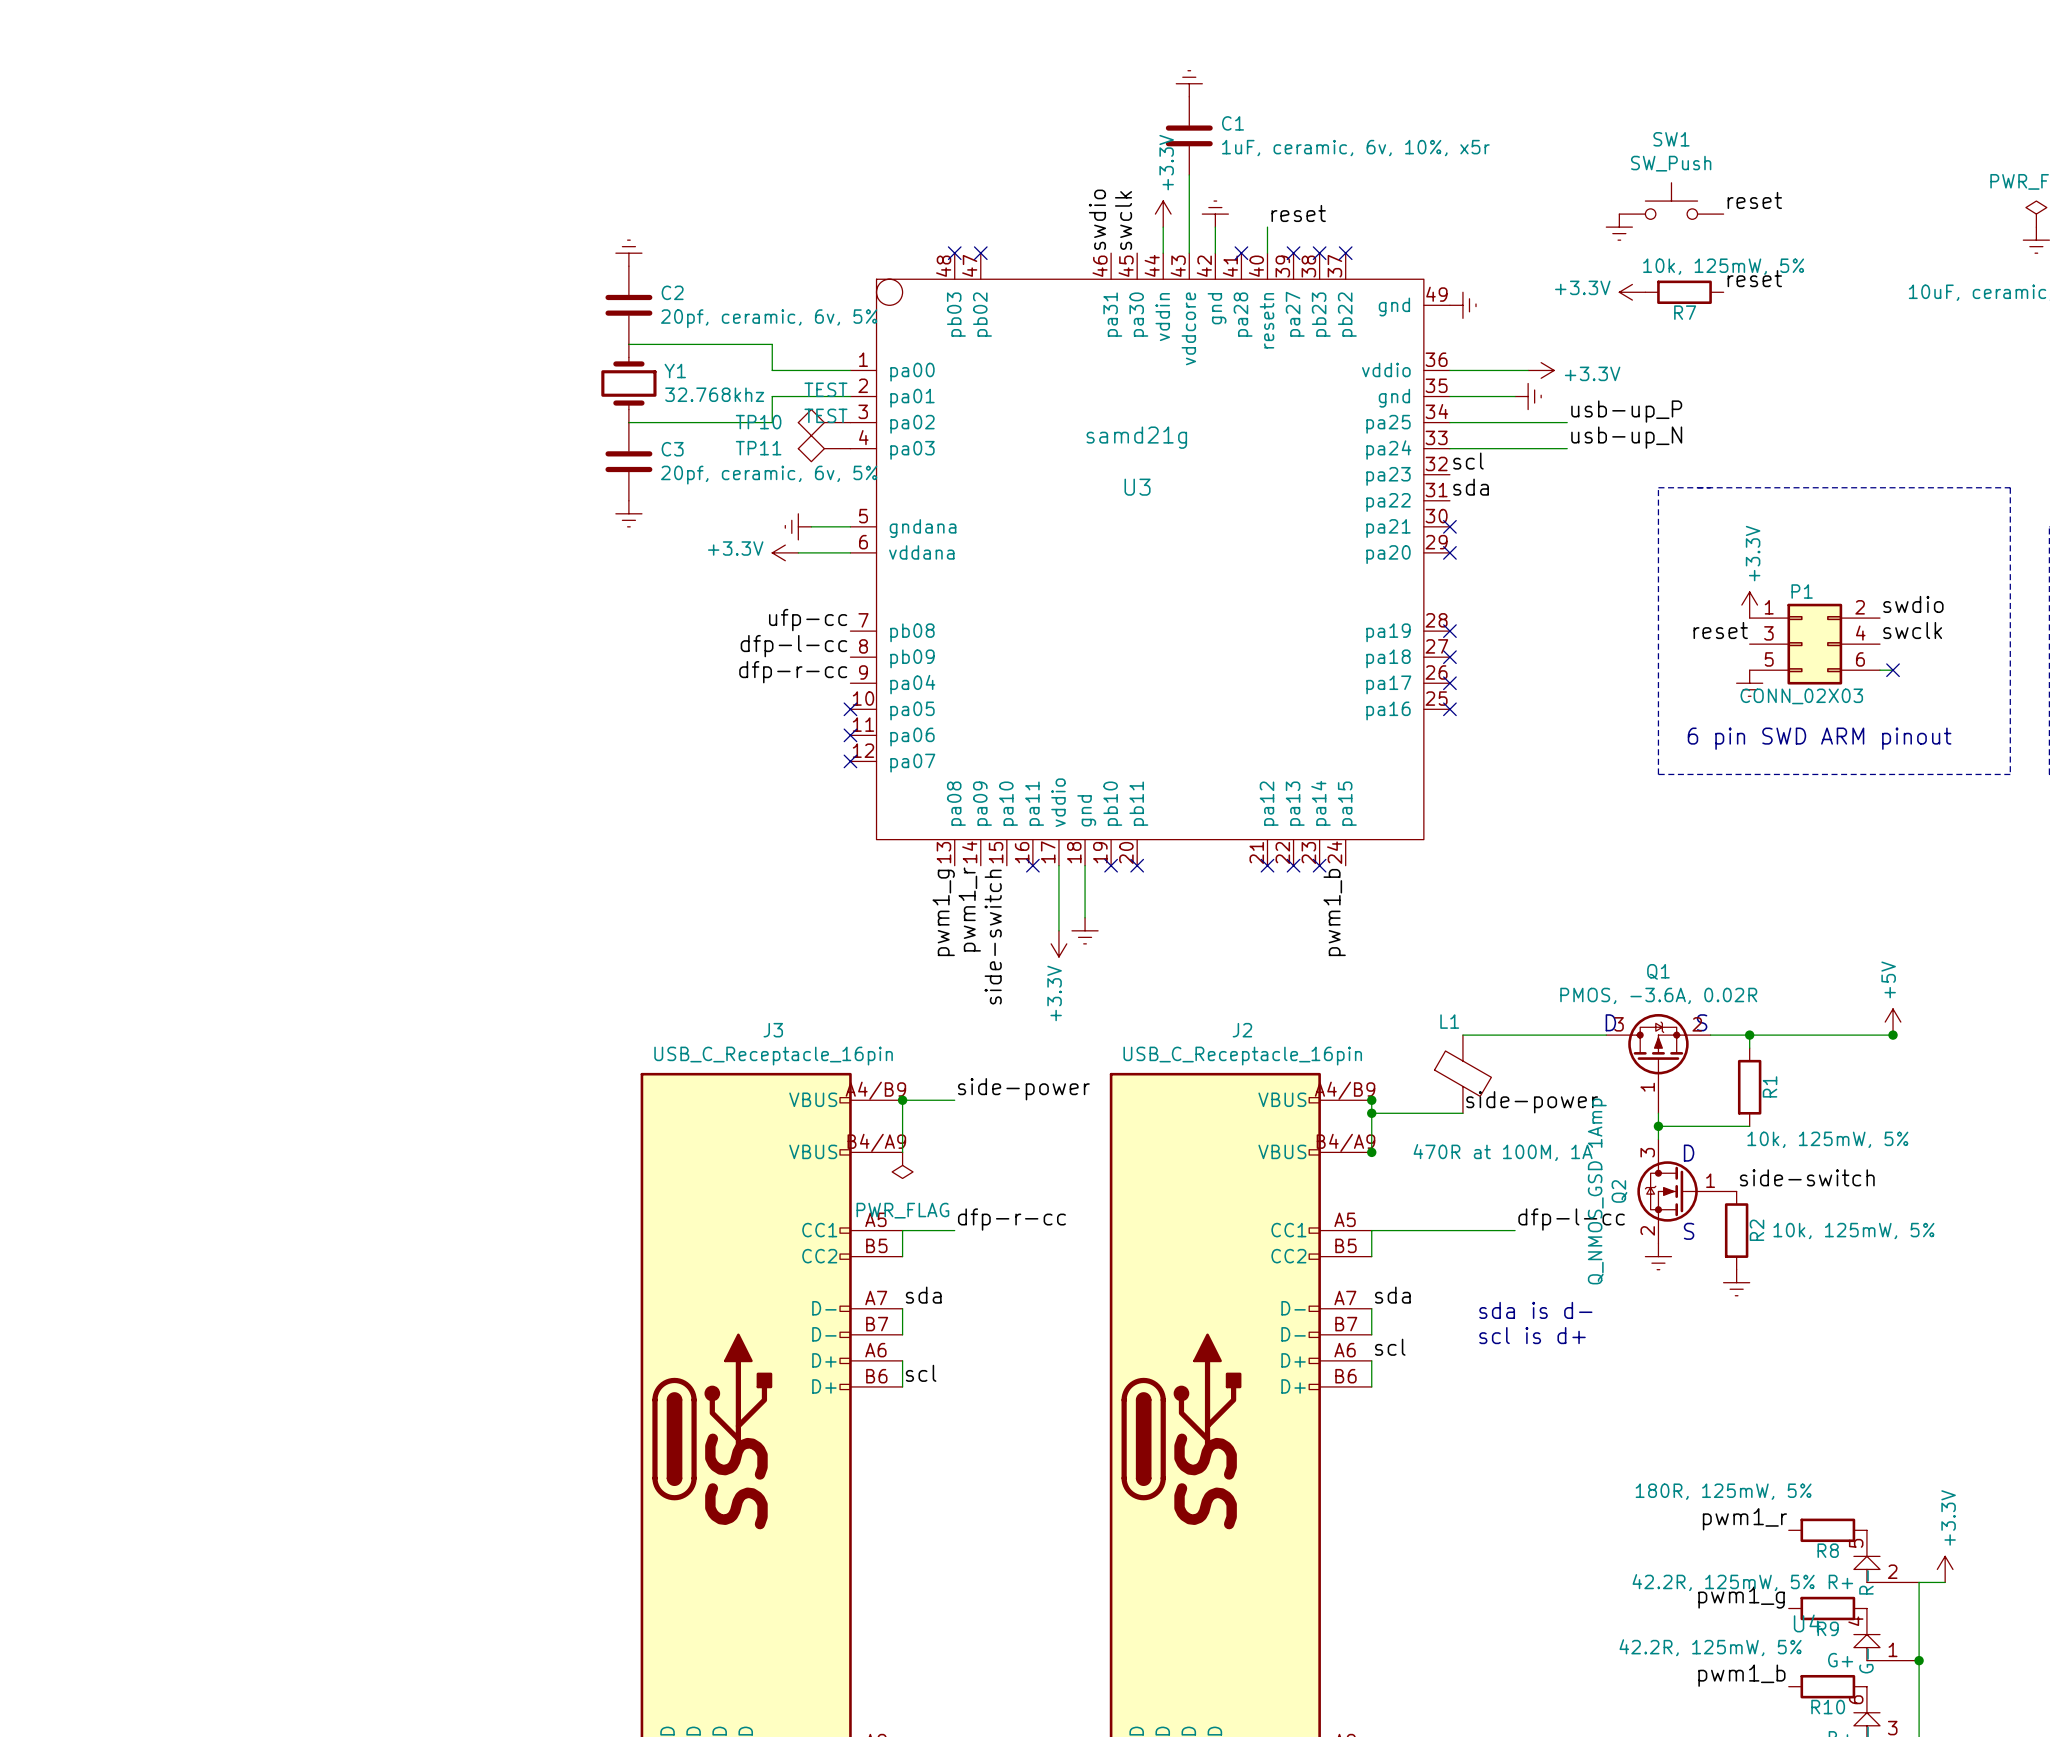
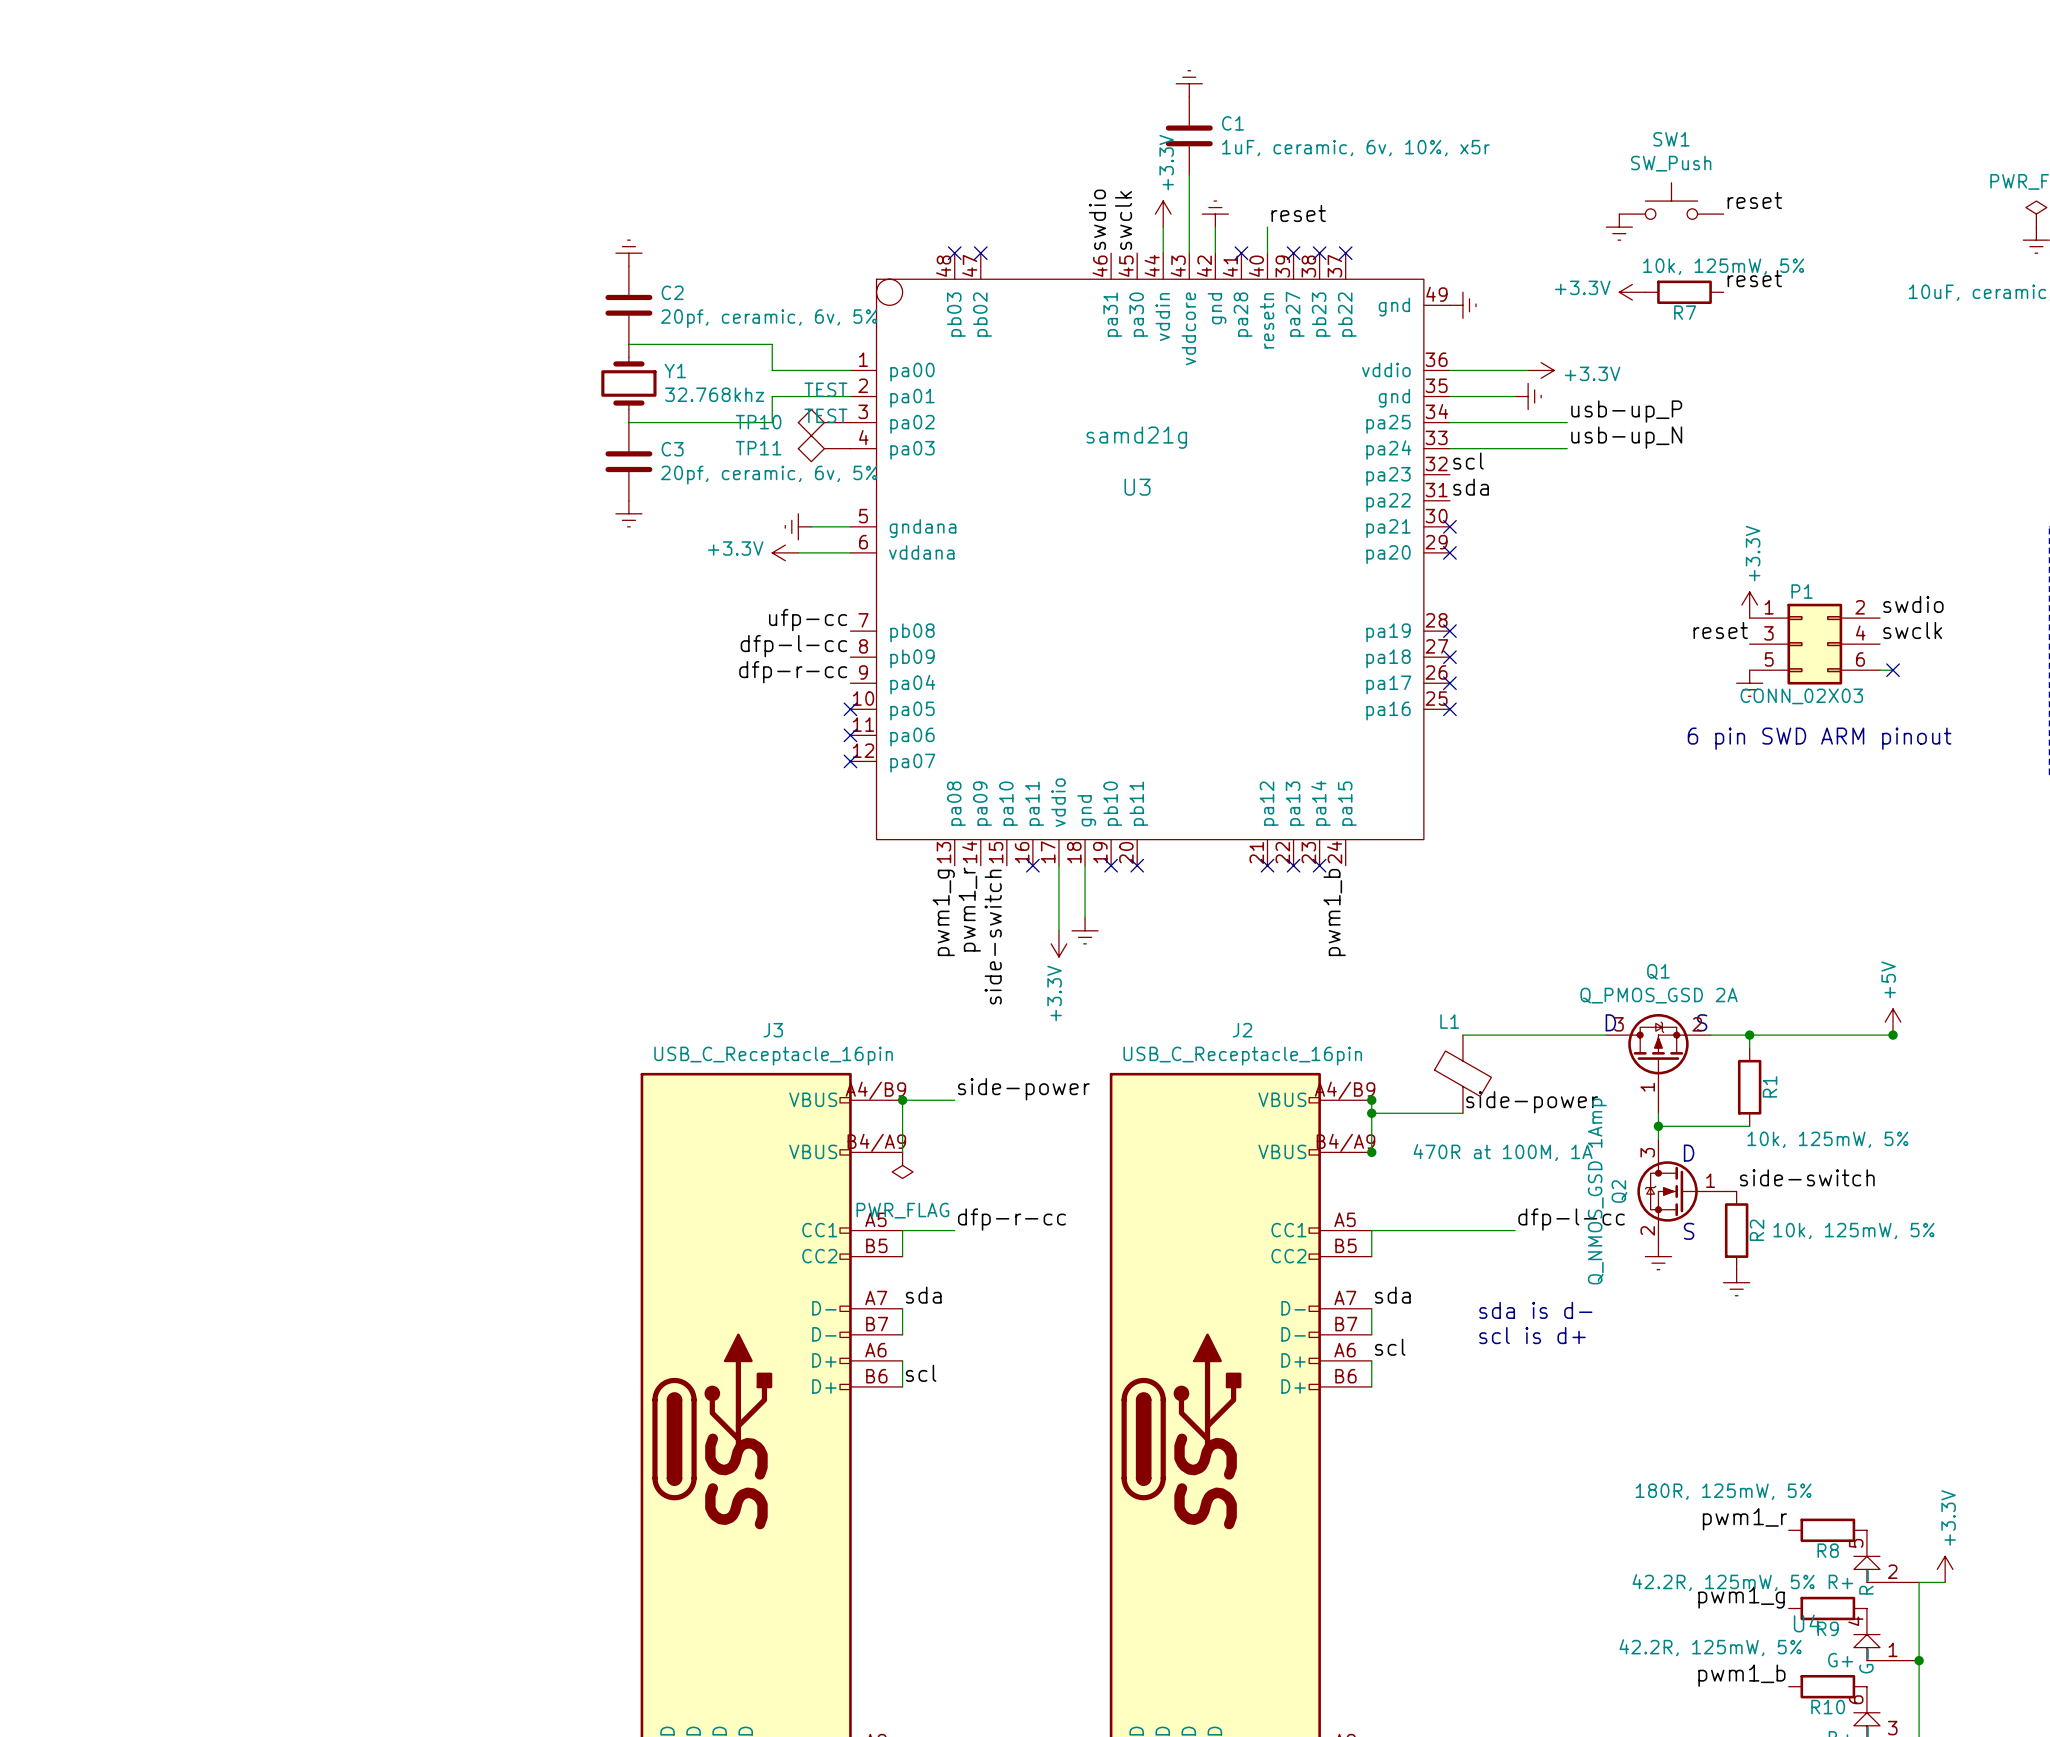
line: (1658, 487) (2010, 487) (2010, 774) (1658, 774) (1658, 487) -> none
Q1 value: PMOS, -3.6A, 0.02R (1658, 995) -> Q_PMOS_GSD 2A (1659, 995)

